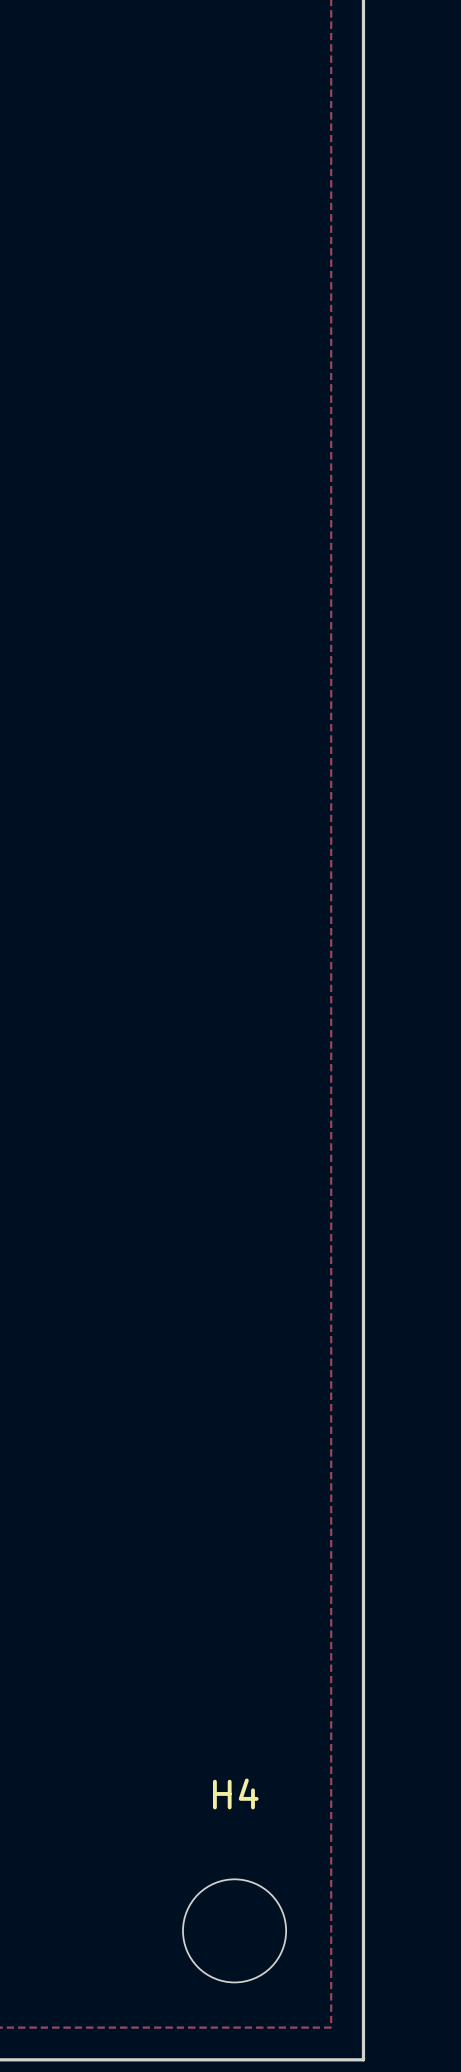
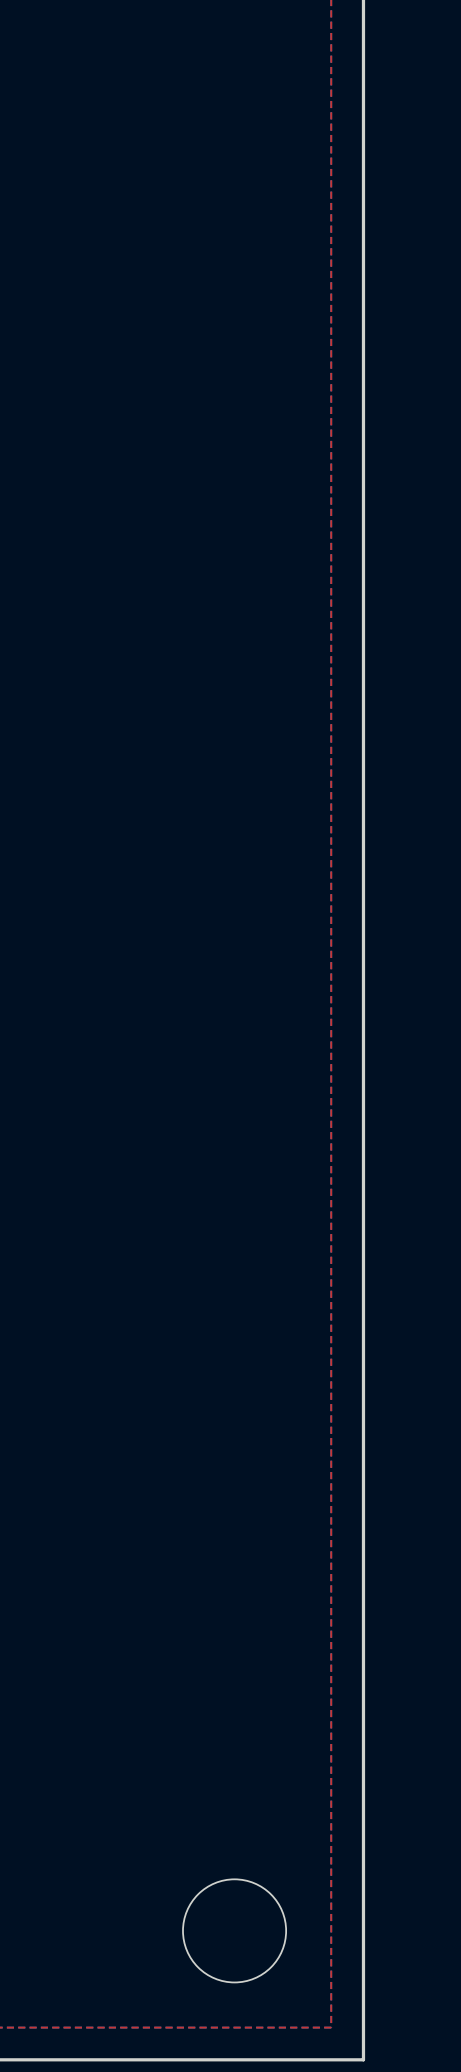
H4 name: H4 (235, 1793) -> none

